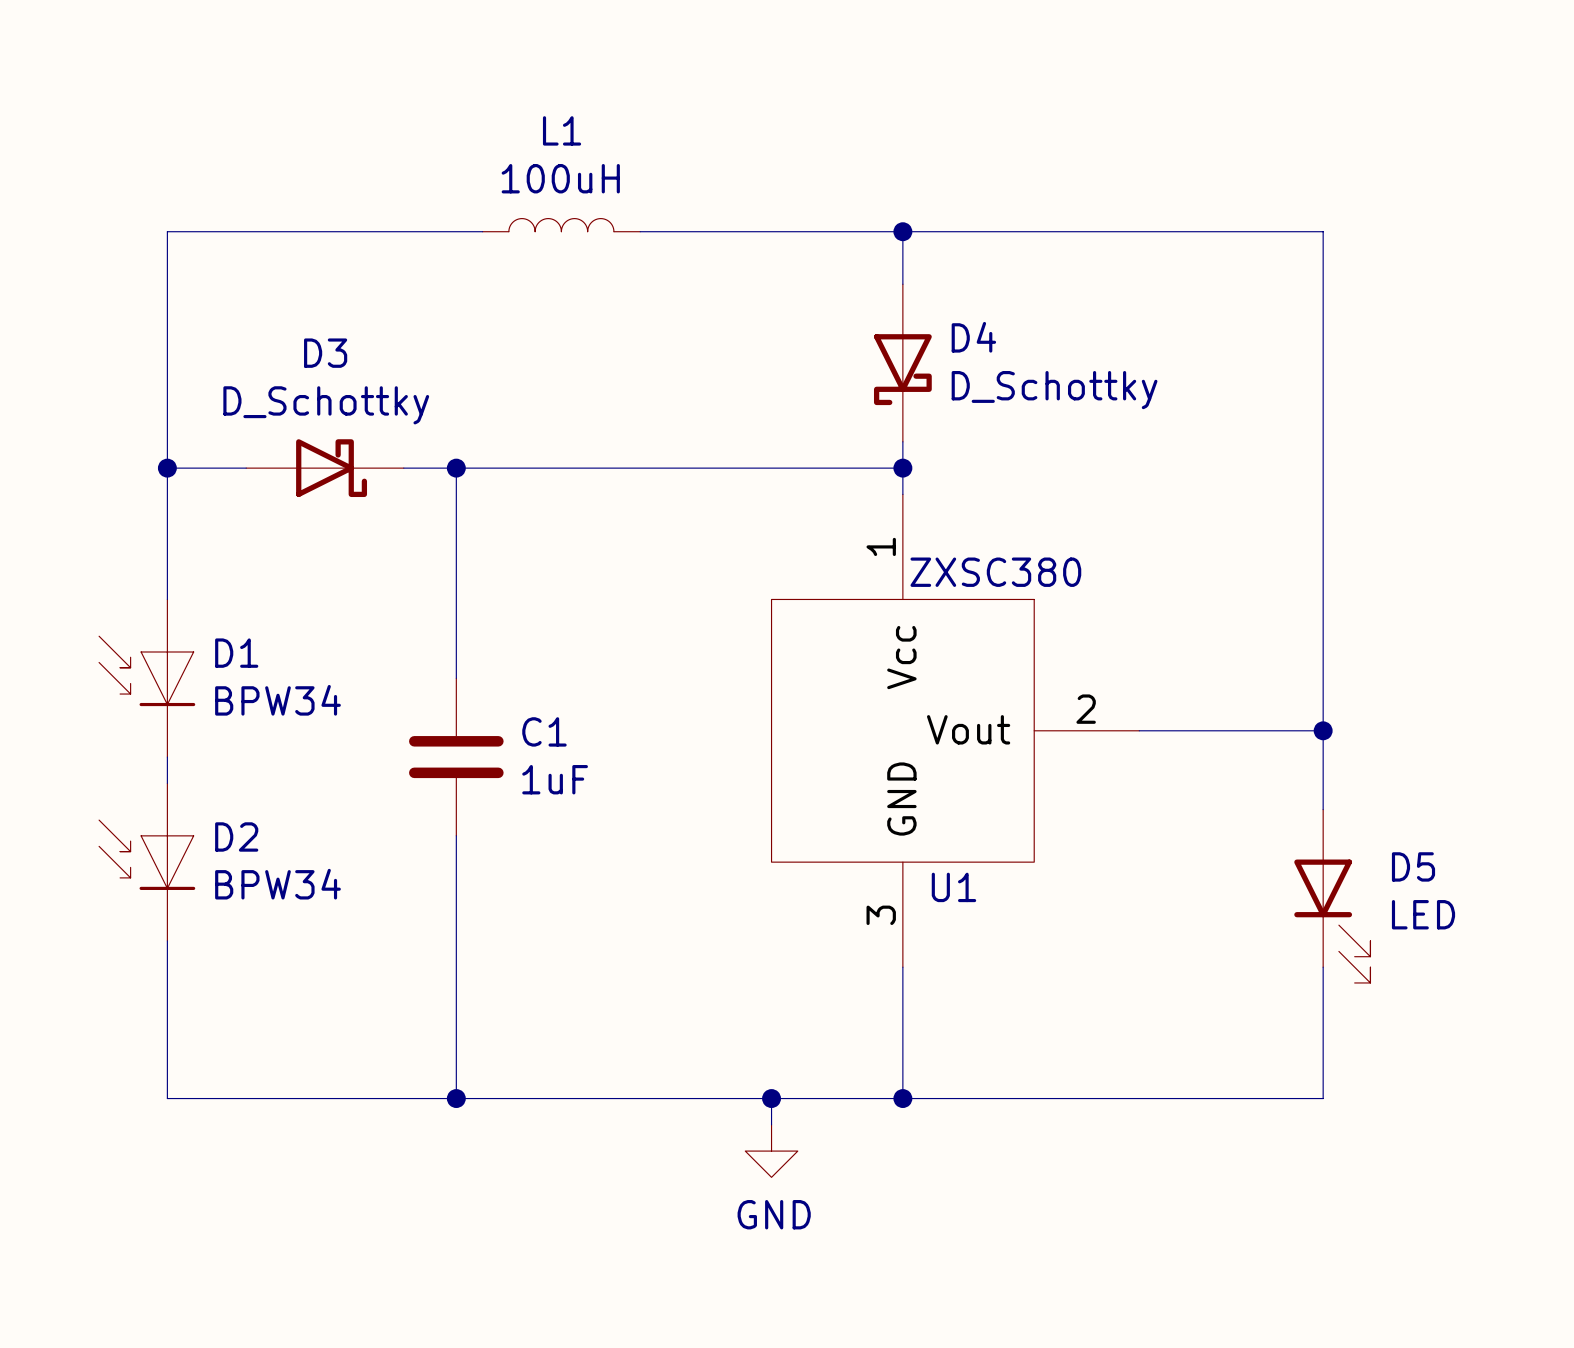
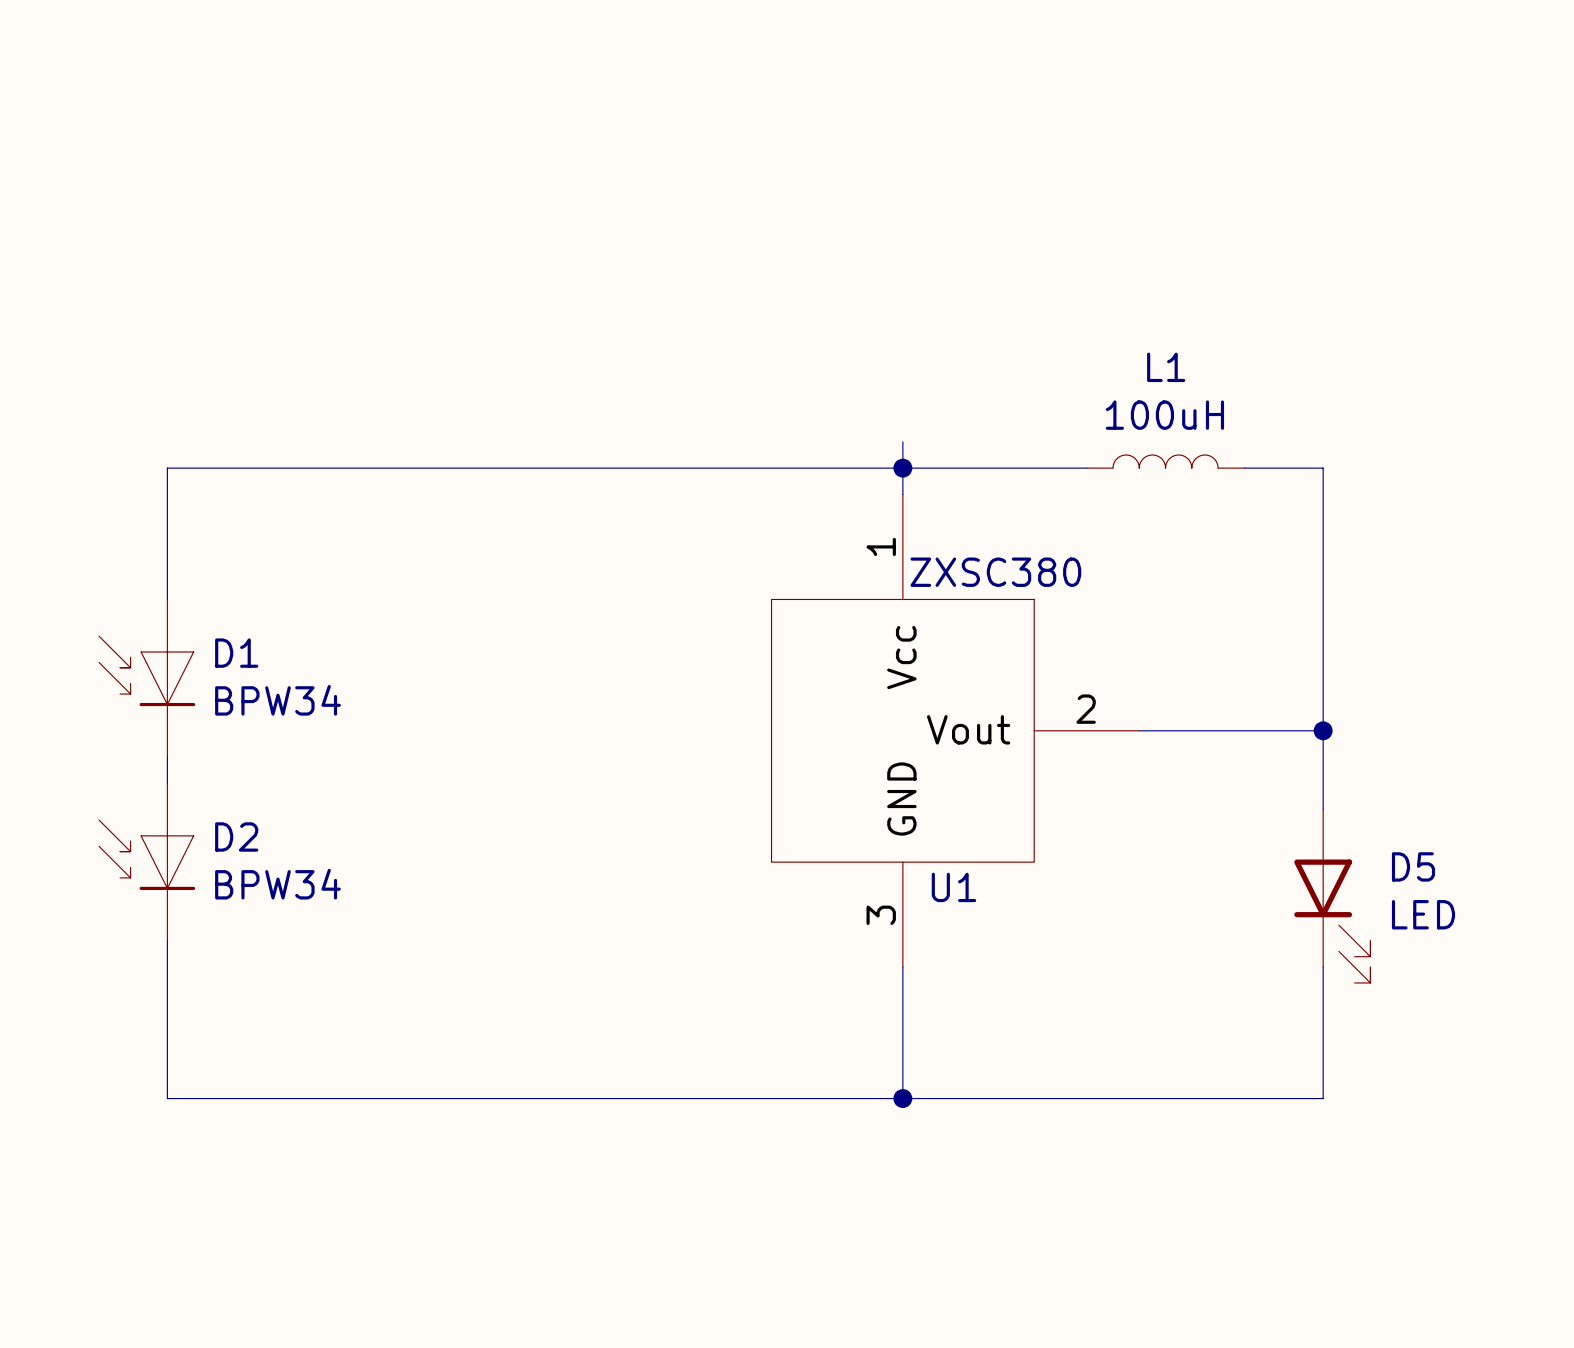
L1 position: (561, 225) -> (1165, 461)
wire: (482, 231) (167, 231) (167, 468) -> none
wire: (640, 231) (1323, 231) (1323, 468) -> (1244, 468) (1323, 468)
wire: (902, 231) (902, 284) -> none
junction: (902, 231) -> none
D4: D_Schottky (902, 363) -> none
junction: (167, 468) -> none
D3: D_Schottky (324, 468) -> none
wire: (456, 468) (456, 678) -> none
junction: (456, 468) -> none
wire: none -> (902, 468) (1086, 468)
C1: 1uF (456, 757) -> none
wire: (456, 835) (456, 1098) -> none
junction: (456, 1098) -> none
wire: (771, 1098) (771, 1124) -> none
junction: (771, 1098) -> none
power symbol: GND (771, 1151) -> none

